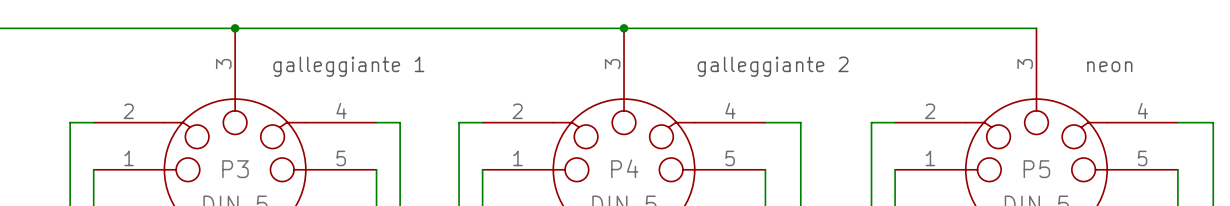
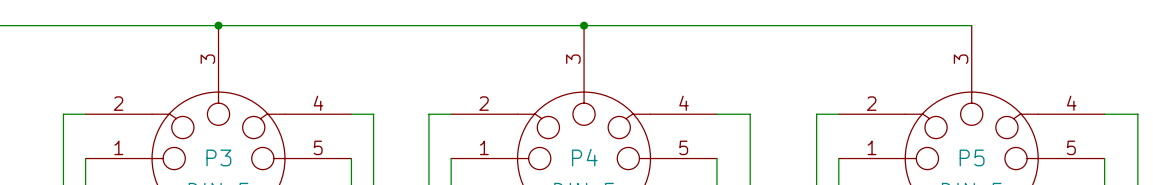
text: galleggiante 1 (348, 66) -> none
text: galleggiante 2 (773, 66) -> none
text: neon (1109, 66) -> none

